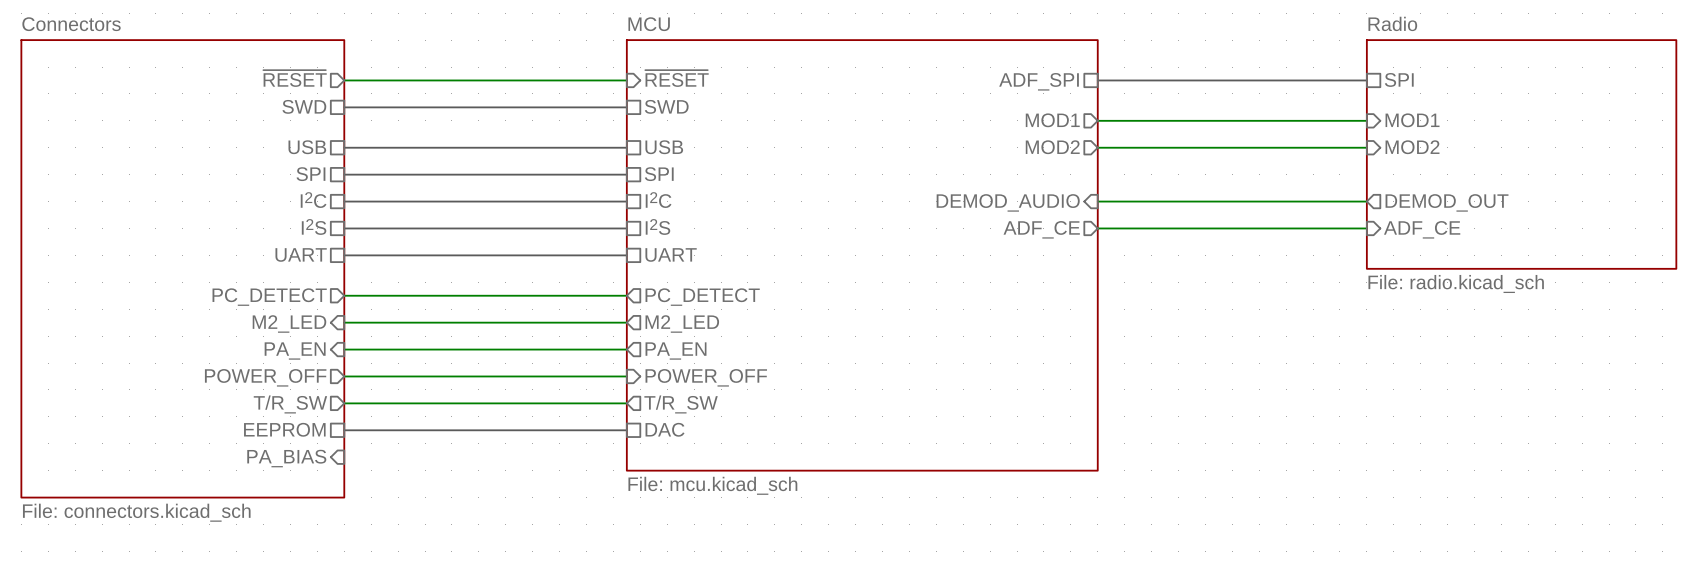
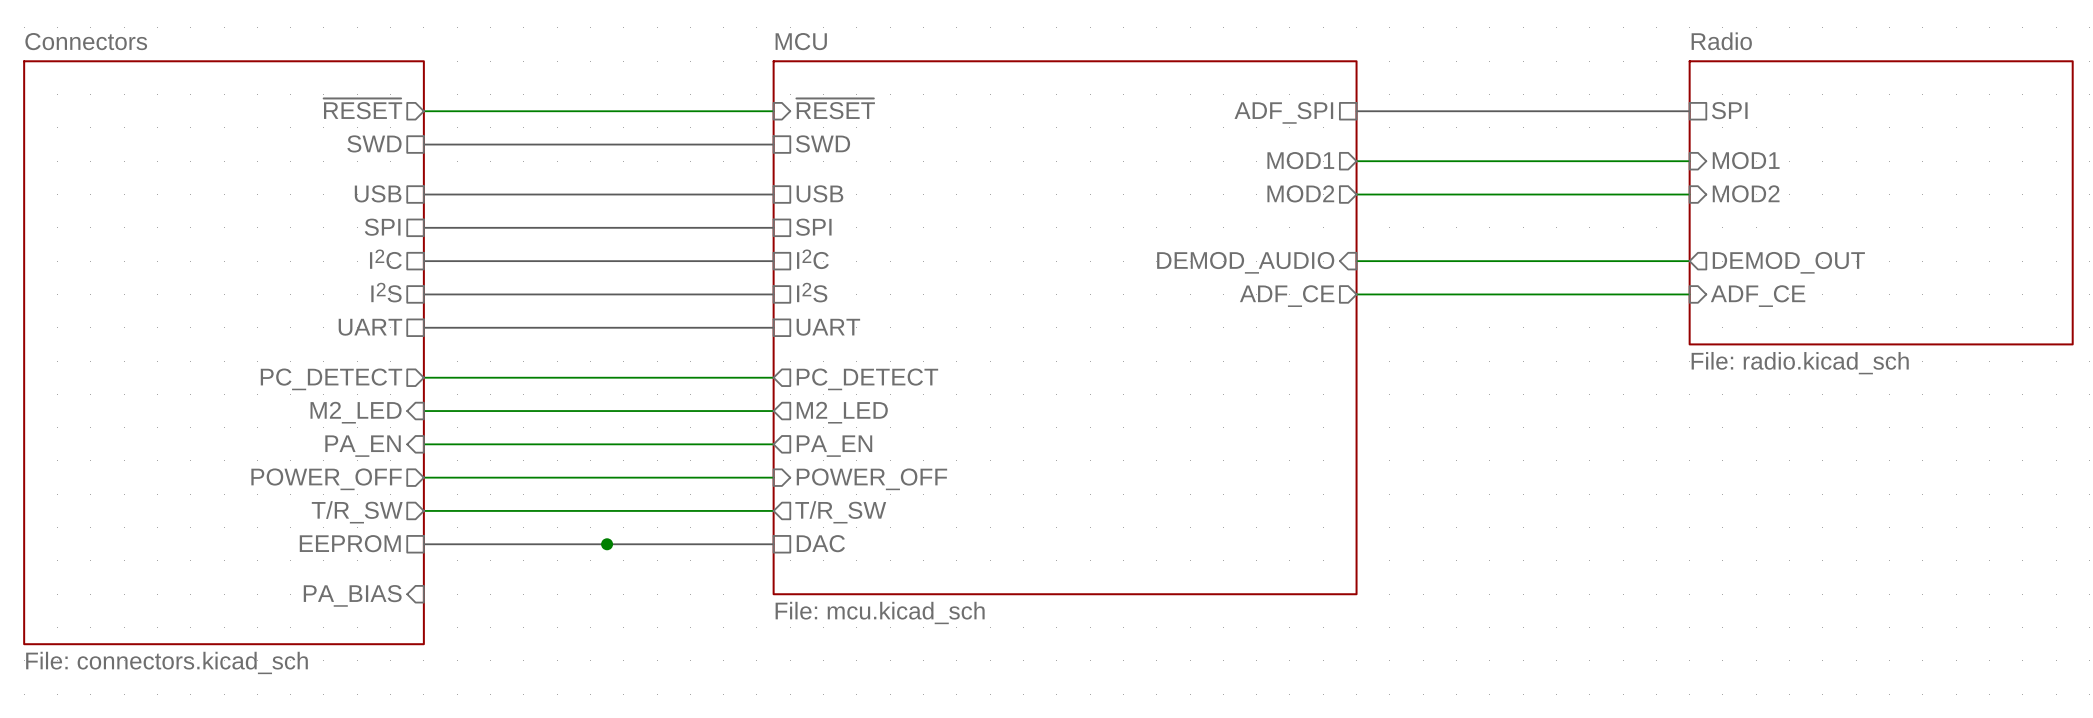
sheet Connectors shape: [20, 39, 346, 499] -> [23, 60, 425, 646]
junction: none -> (607, 544)
sheet pin position: PA_BIAS (286, 458) -> PA_BIAS (352, 595)

